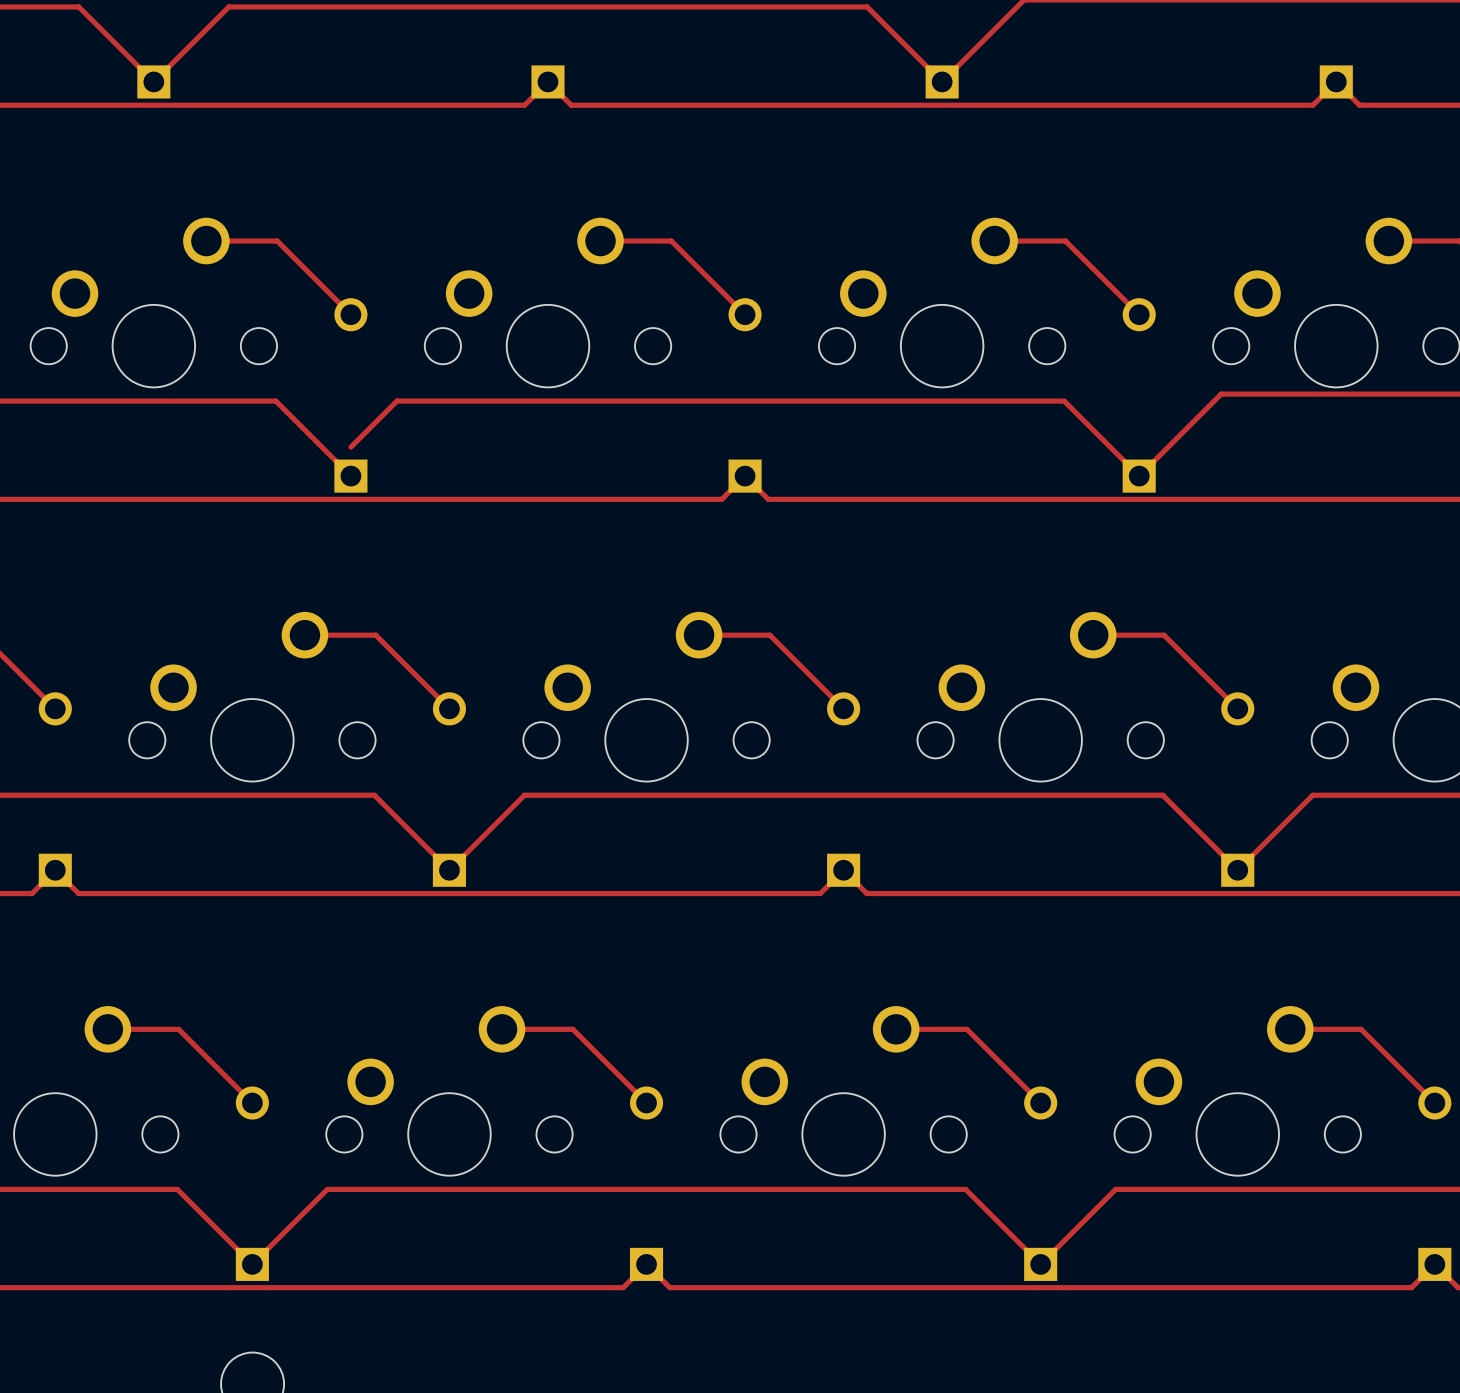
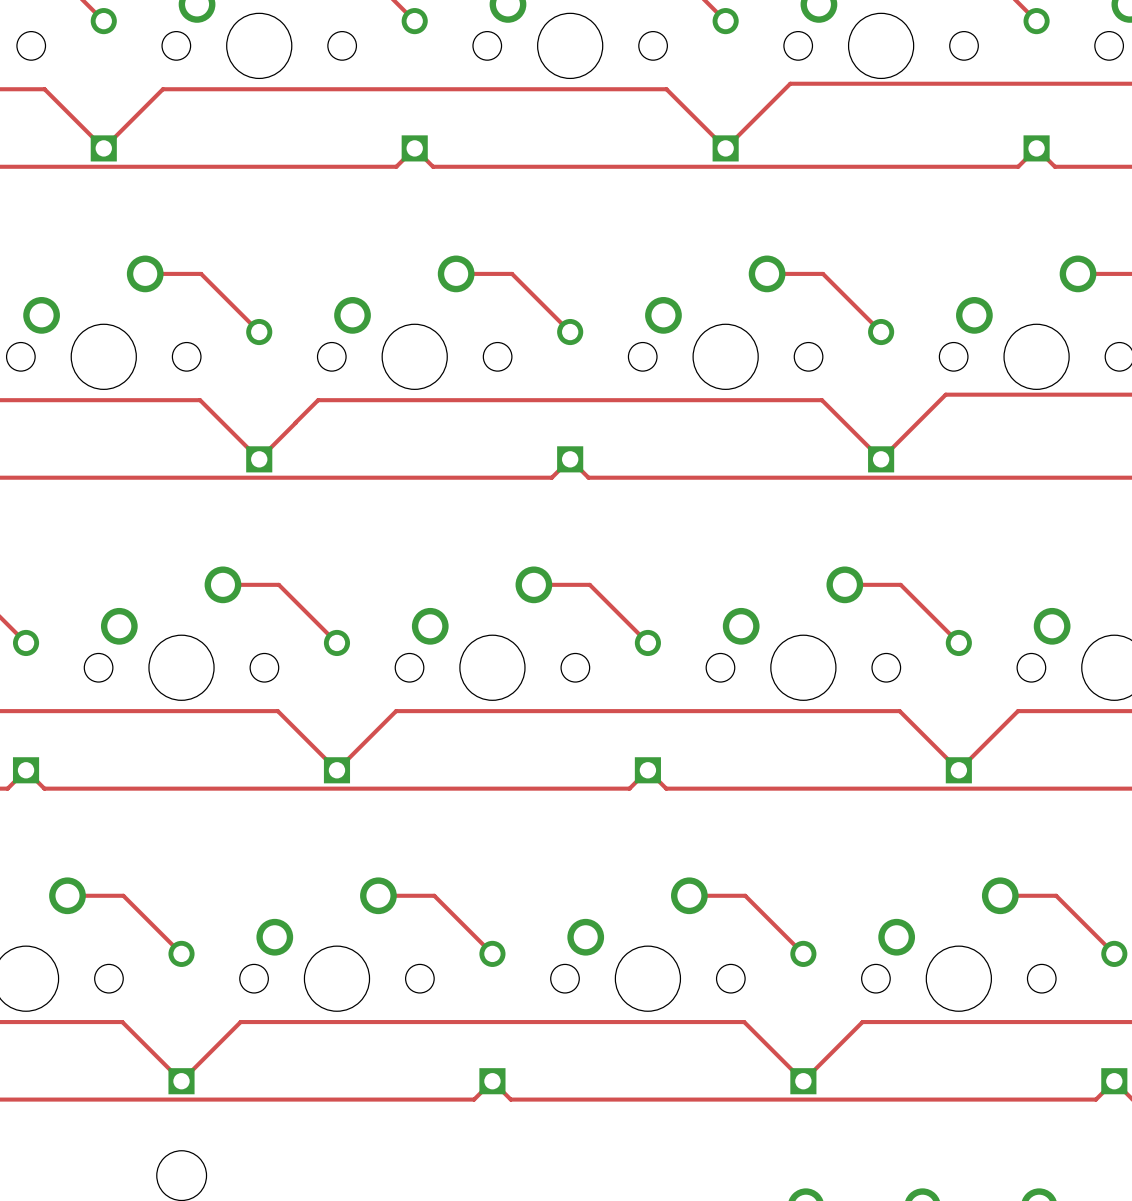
track: (425, 401) (396, 401) (350, 447) -> (318, 400) (295, 422)
track: none -> (295, 423) (259, 459)

